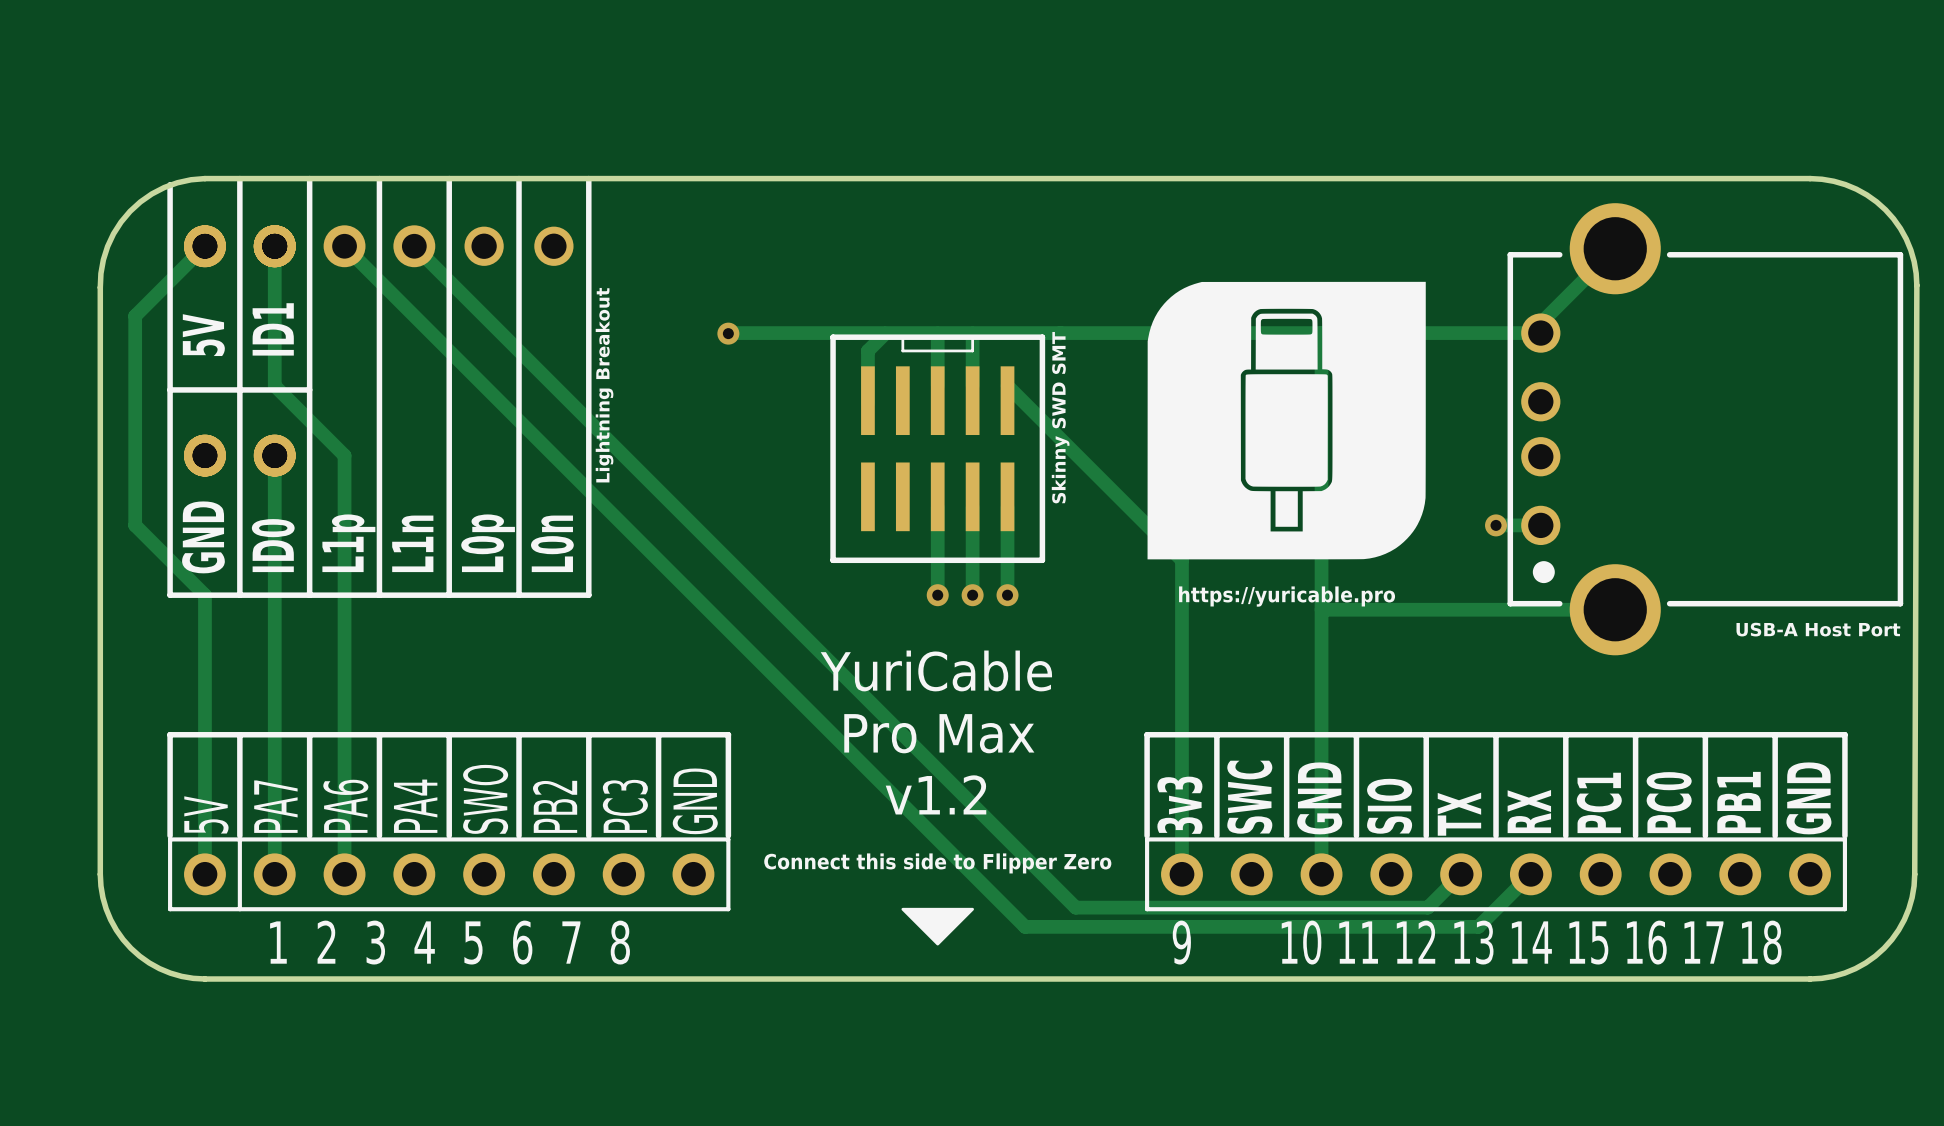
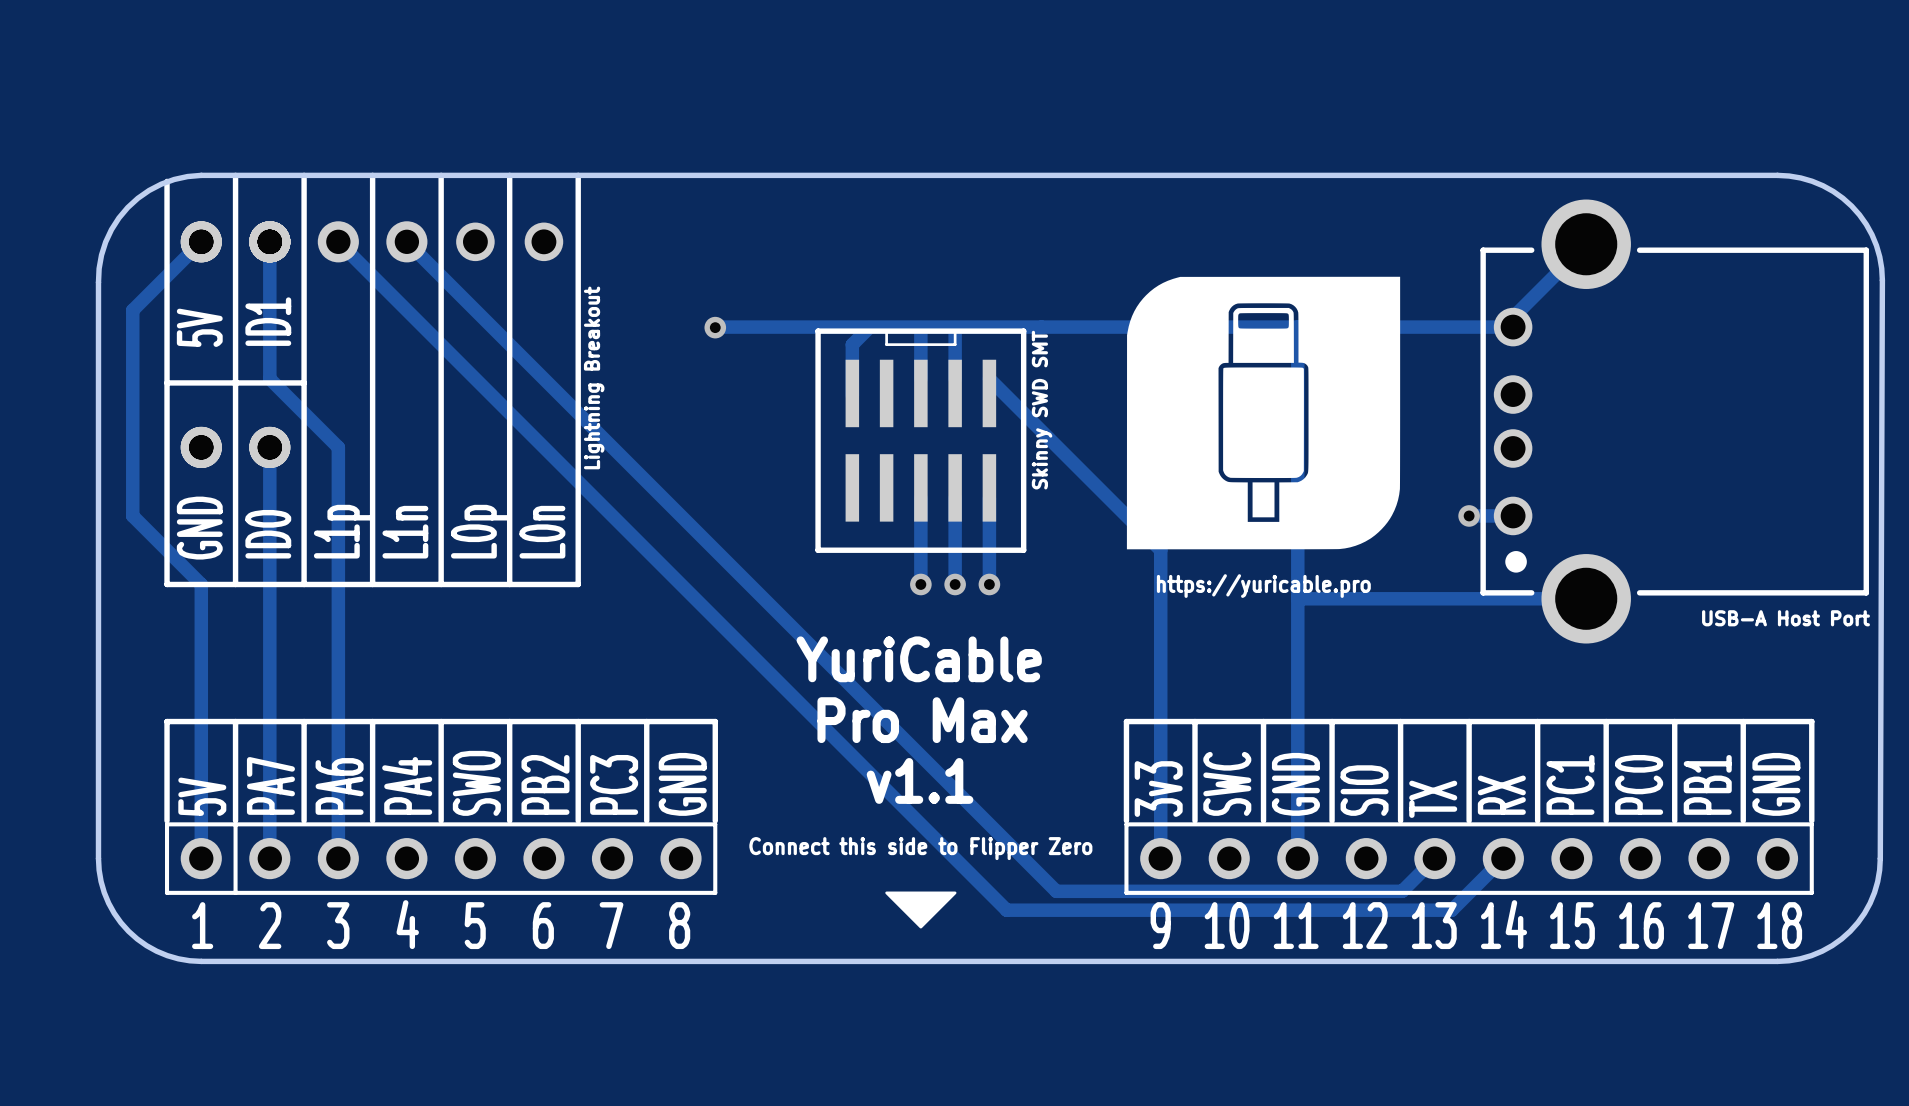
text: v1.2 (936, 794) -> v1.1 (920, 780)

